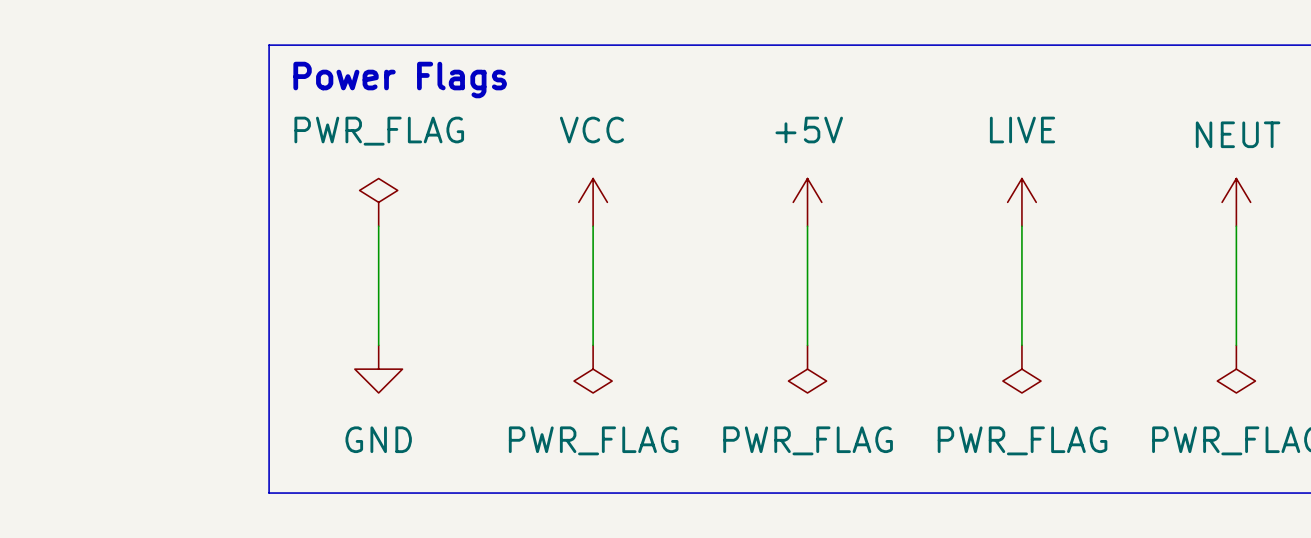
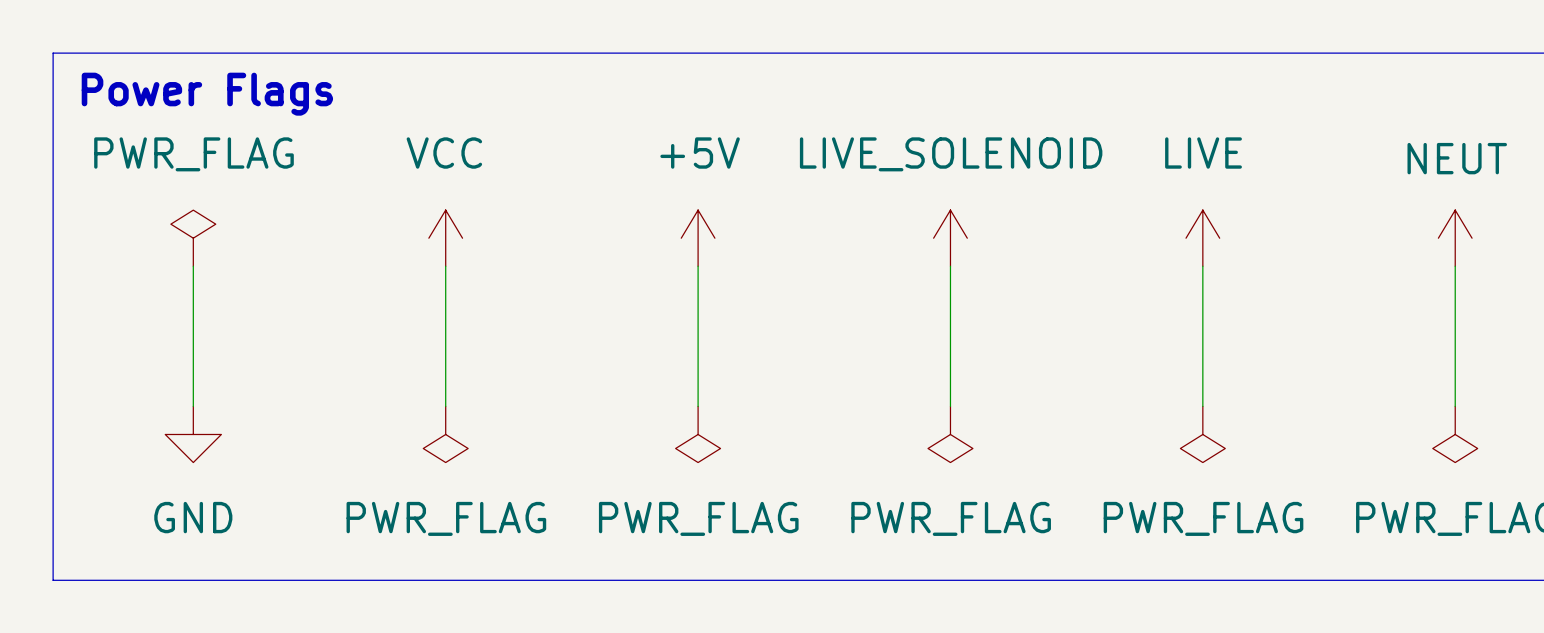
line: (269, 45) (269, 493) -> (316, 53) (53, 53) (53, 580) (316, 580)
text position: Power Flags (400, 80) -> Power Flags (207, 94)
power symbol: none -> PWR_FLAG (193, 238)
power symbol: PWR_FLAG (378, 202) -> VCC (445, 238)
power symbol: VCC (593, 202) -> +5V (698, 238)
power symbol: +5V (807, 202) -> LIVE_SOLENOID (950, 238)
wire: none -> (193, 266) (193, 406)
power symbol: none -> GND (193, 434)
power symbol: GND (378, 369) -> PWR_FLAG (445, 434)

